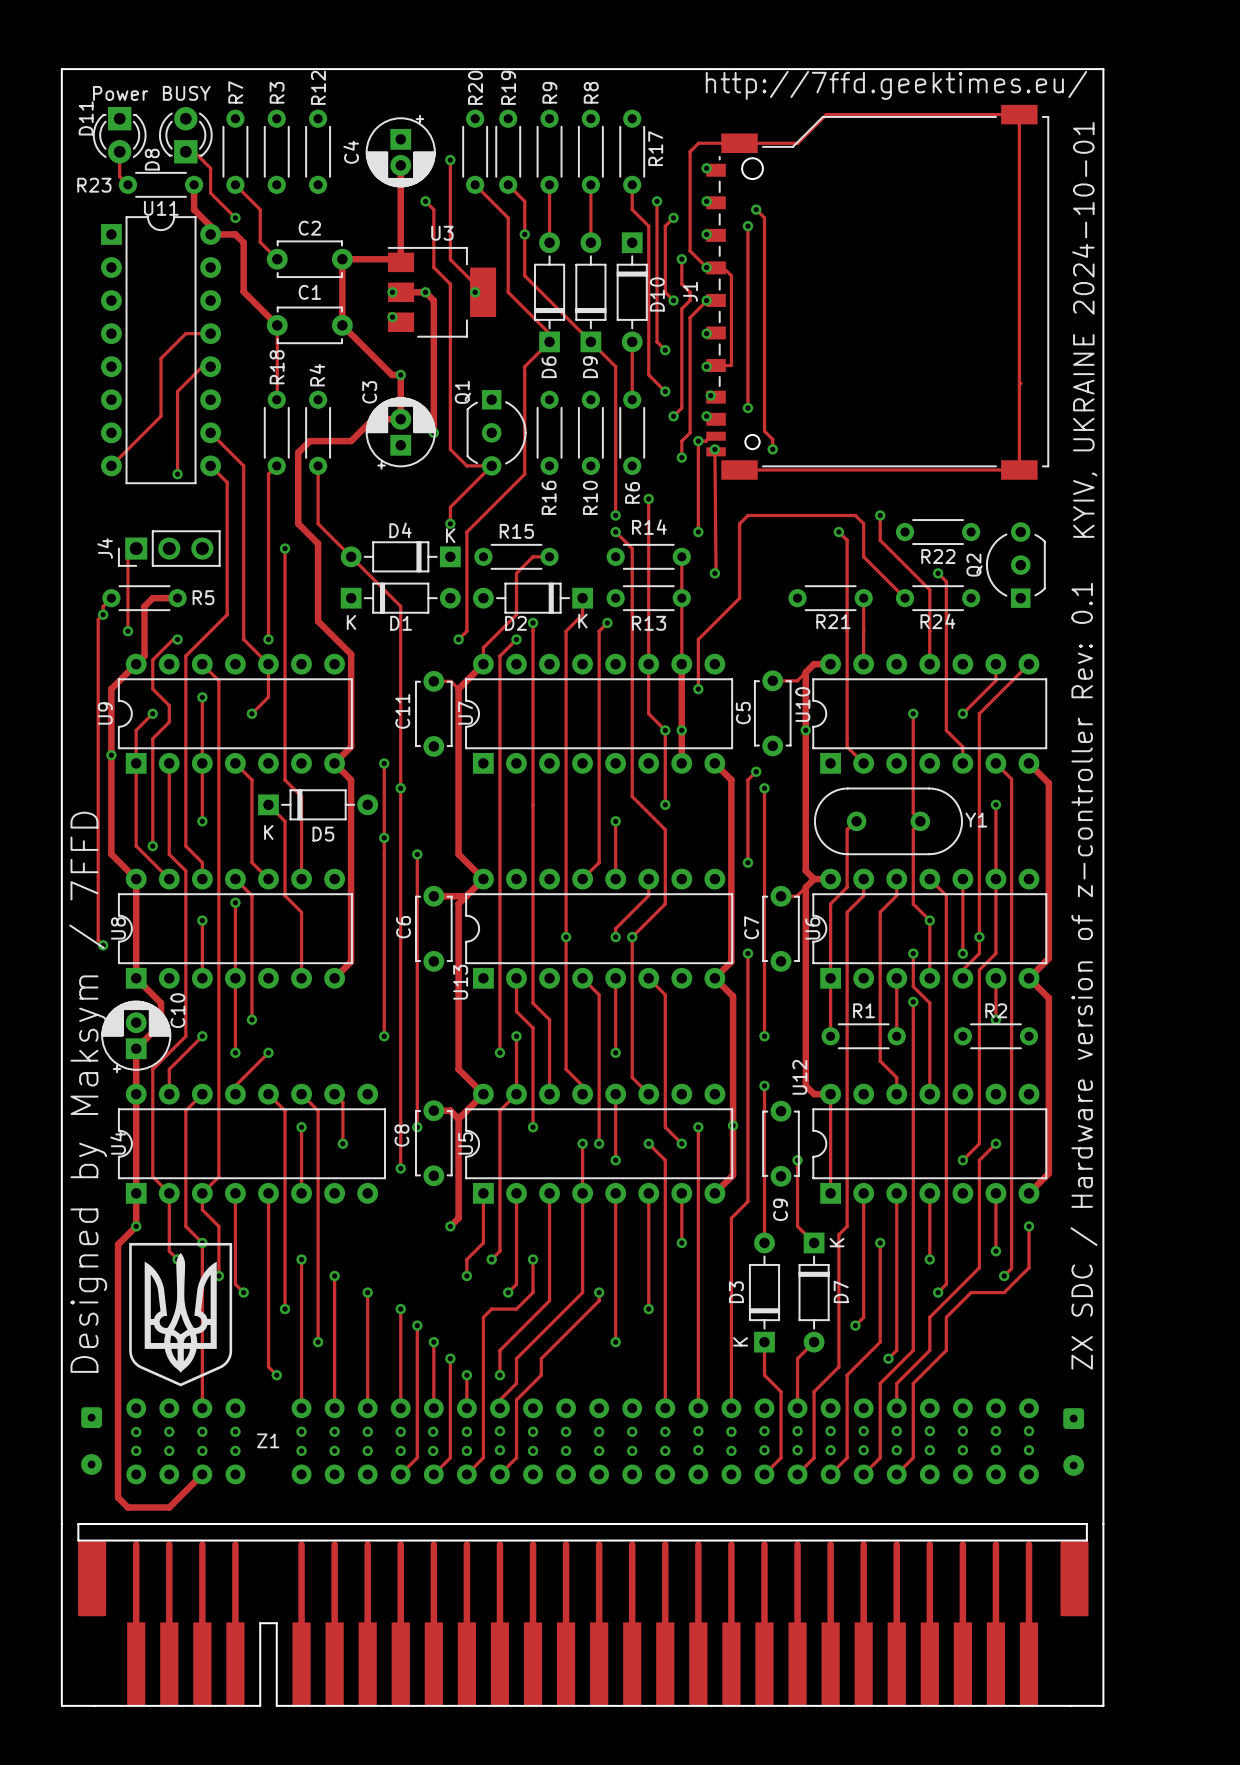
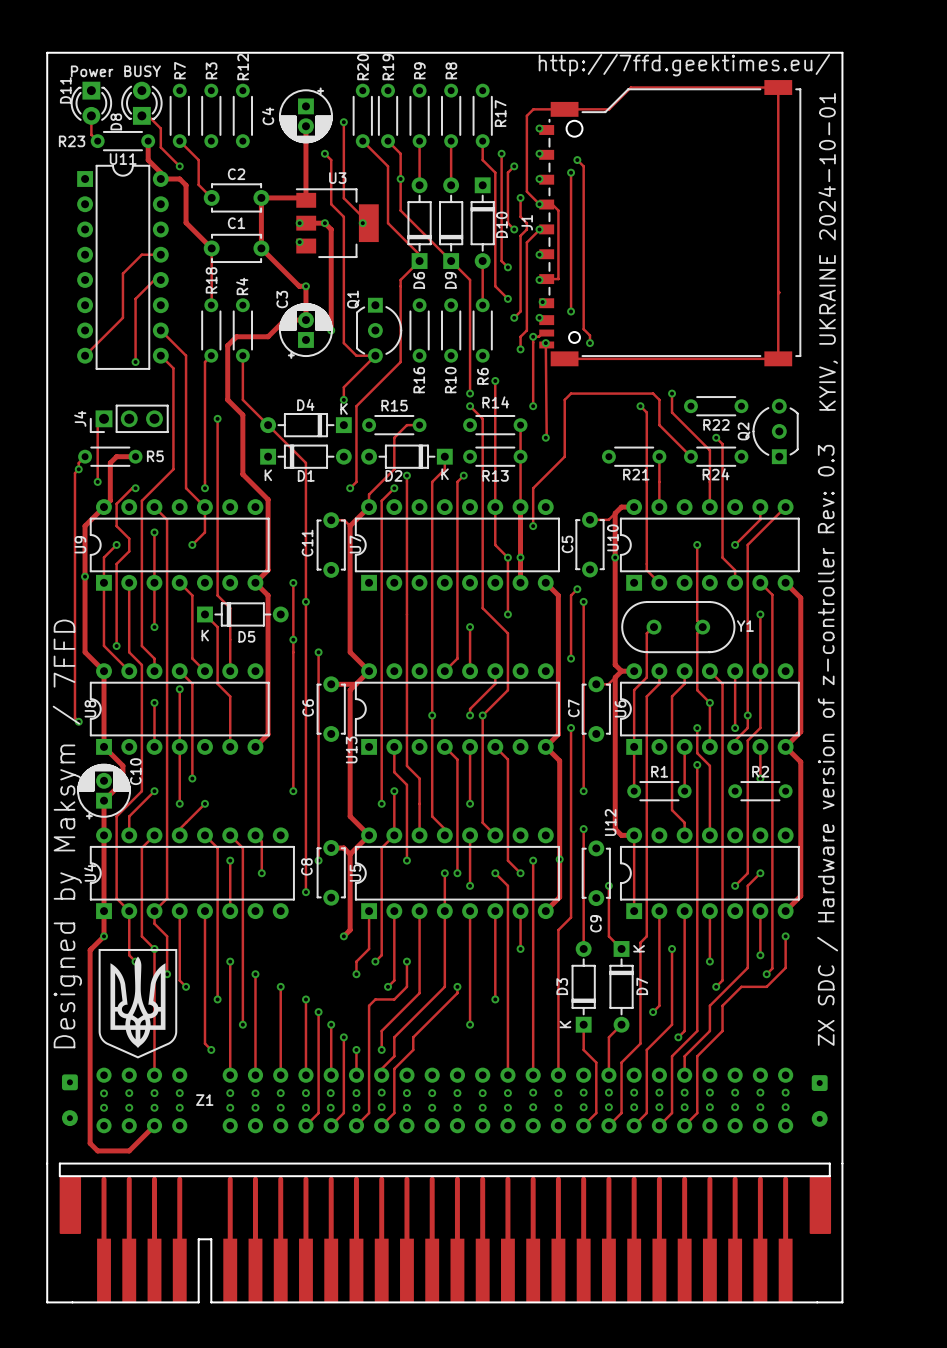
text: ZX SDC / Hardware version of z-controller Rev: 0.1 (1084, 976) -> ZX SDC / Hardware version of z-controller Rev: 0.3 (827, 745)

